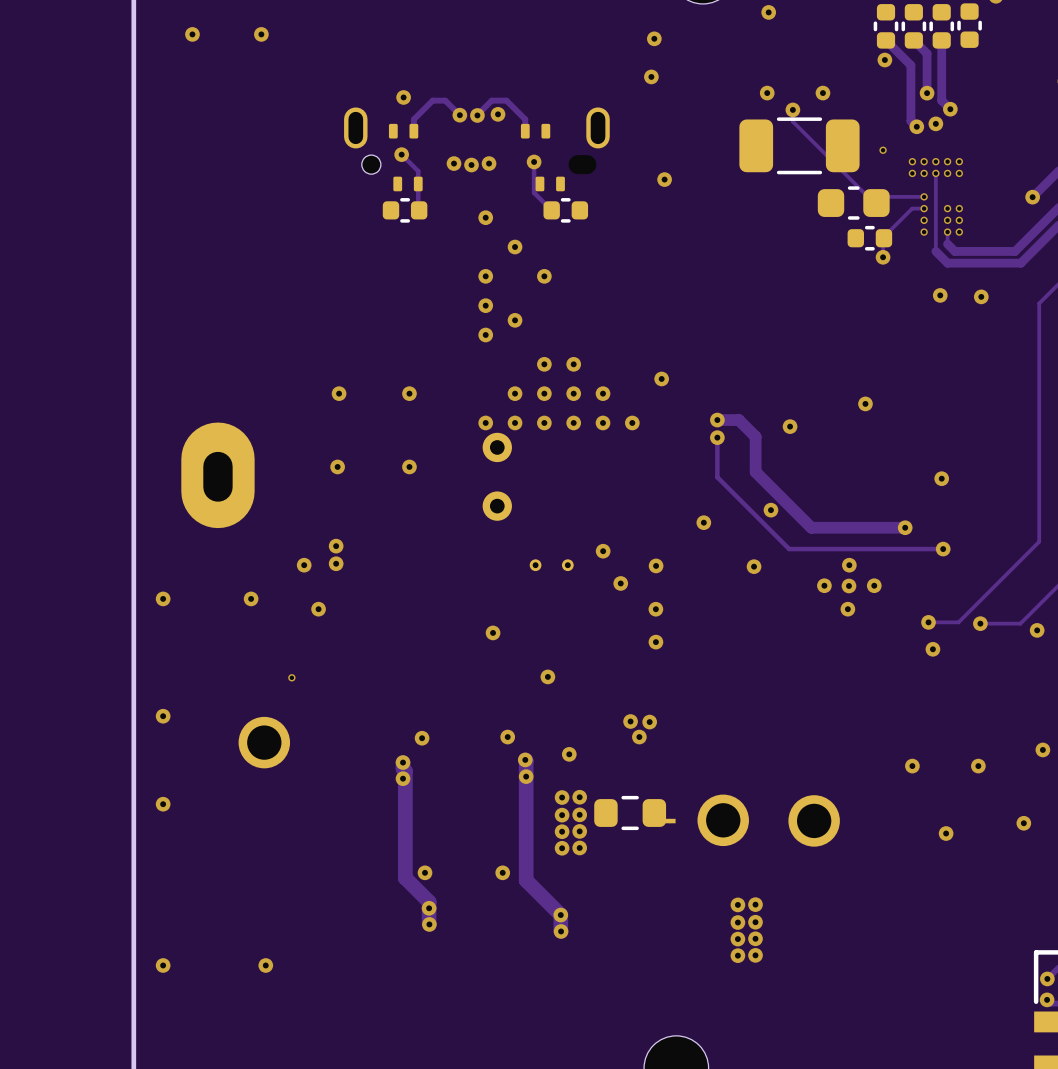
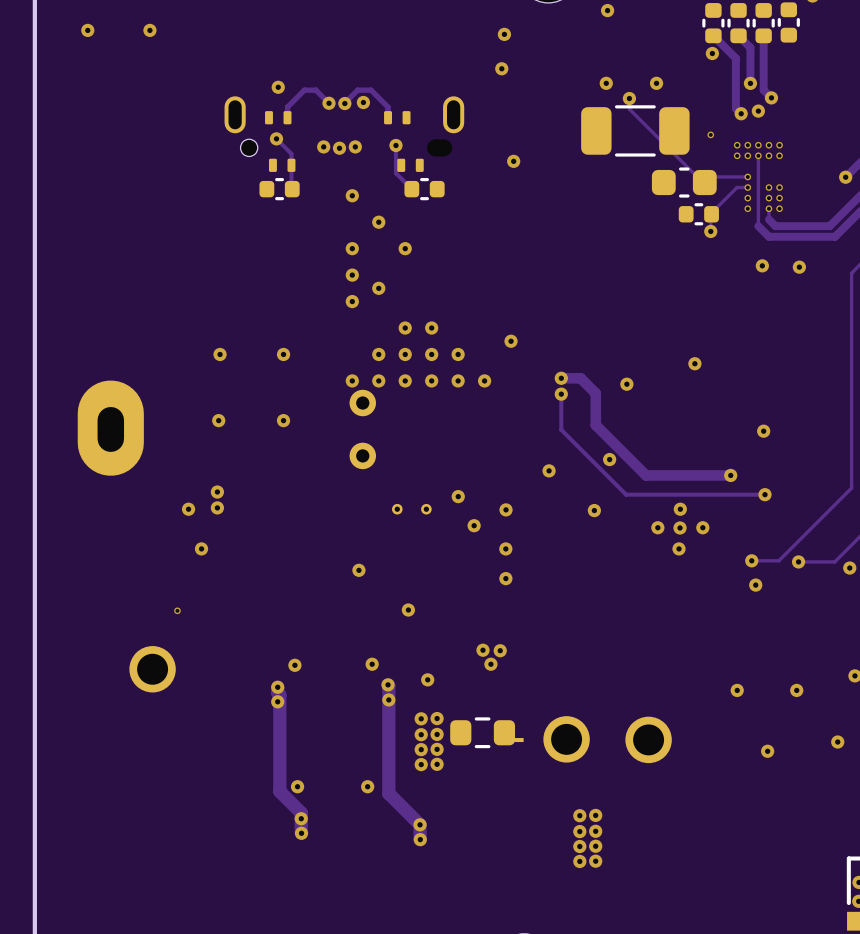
via: (163, 598) -> none
via: (251, 598) -> none
via: (163, 716) -> none
via: (163, 804) -> none
via: (163, 965) -> none
via: (265, 965) -> none

